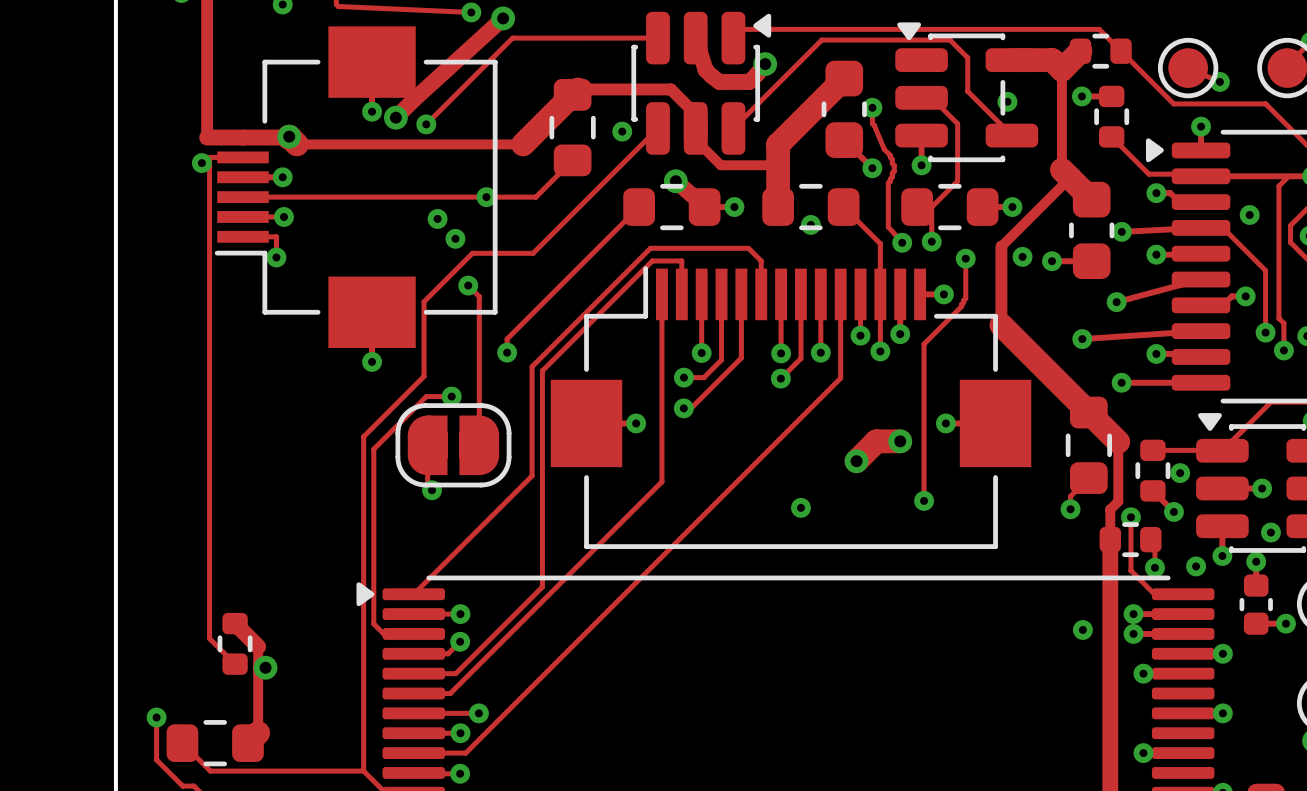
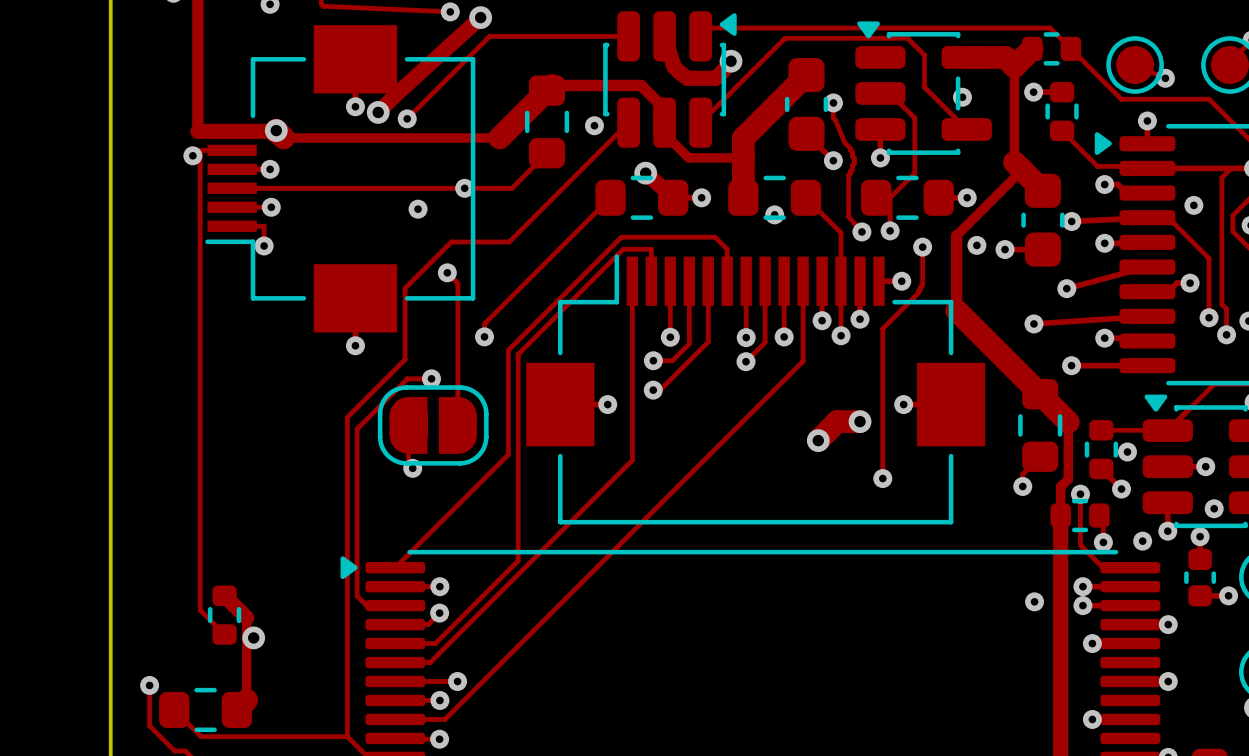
via: (455, 238) -> none
via: (800, 507) -> none

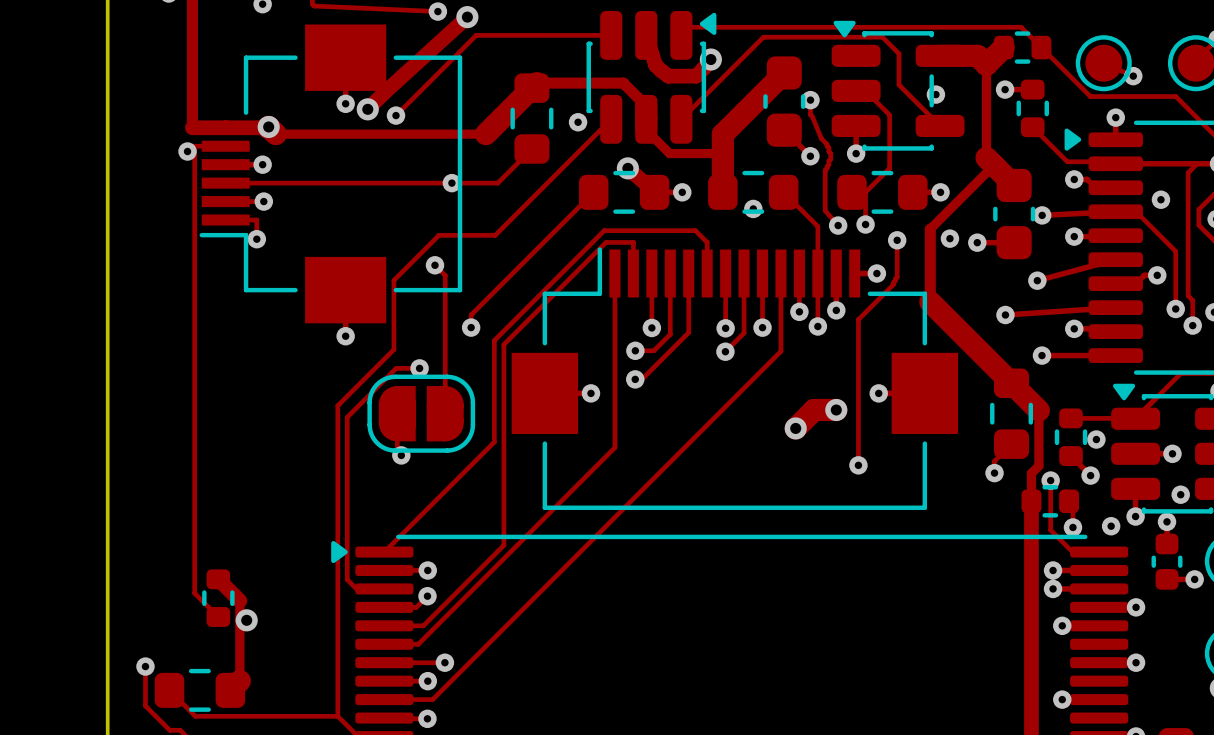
via: (418, 209) -> none
via: (1034, 601) -> none

